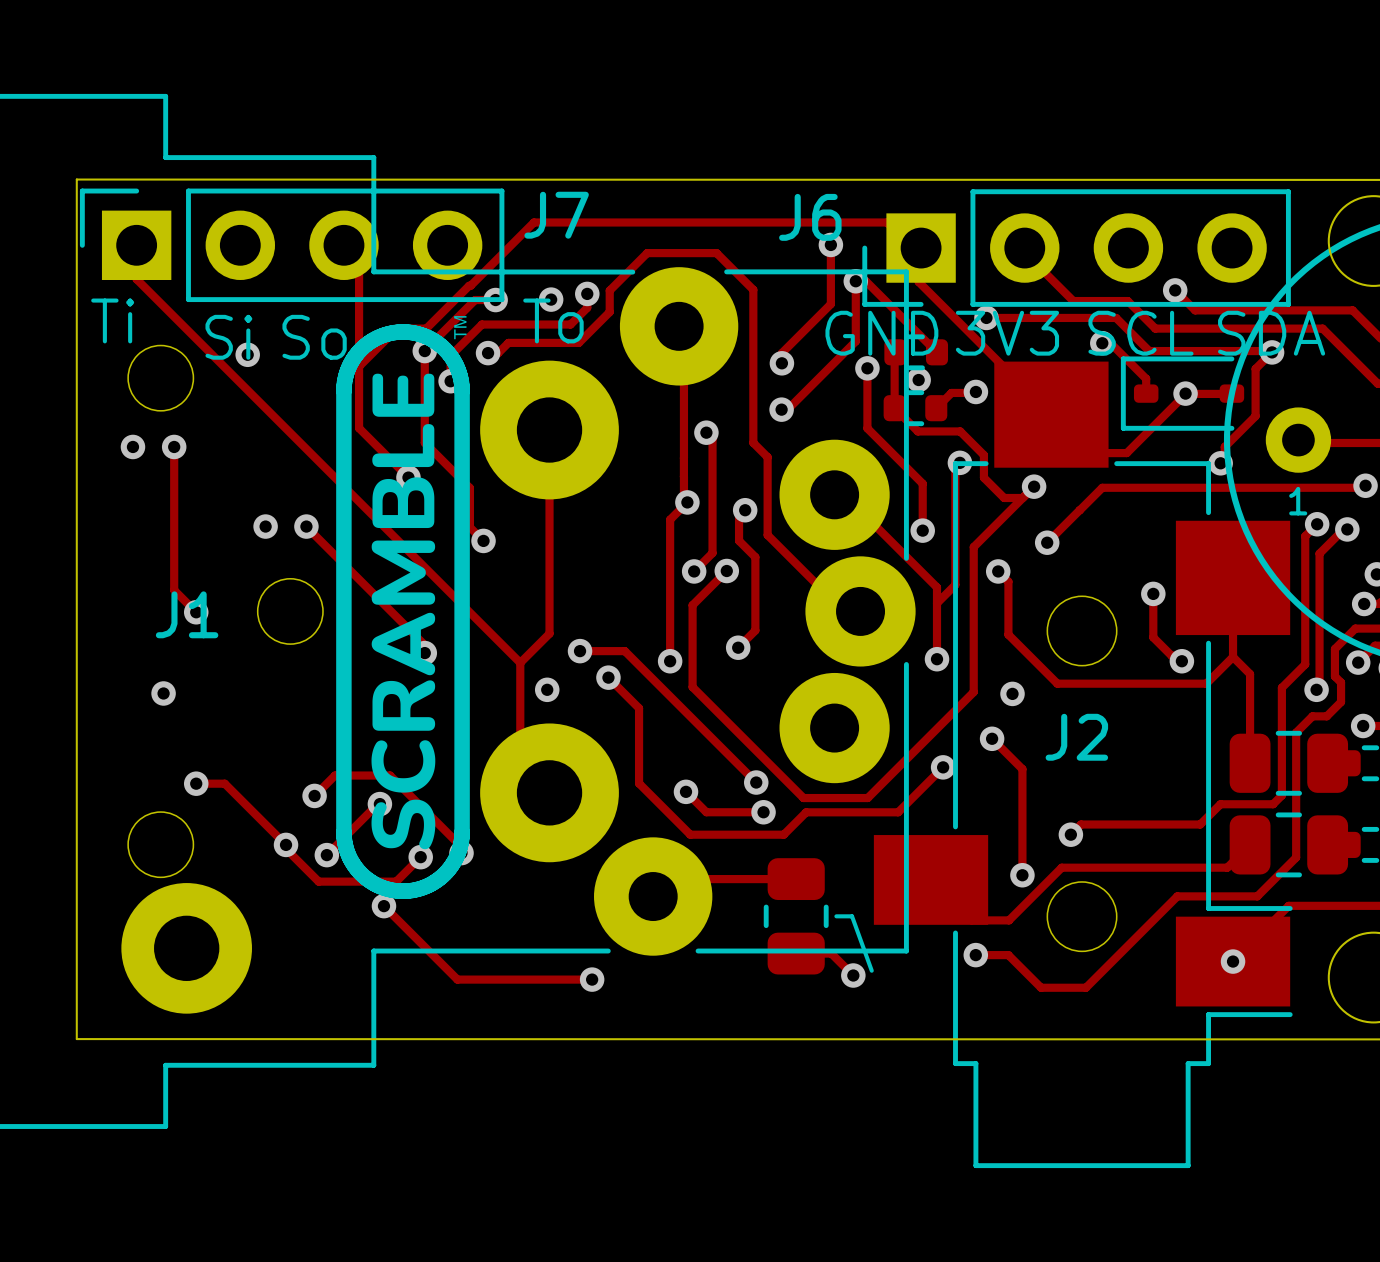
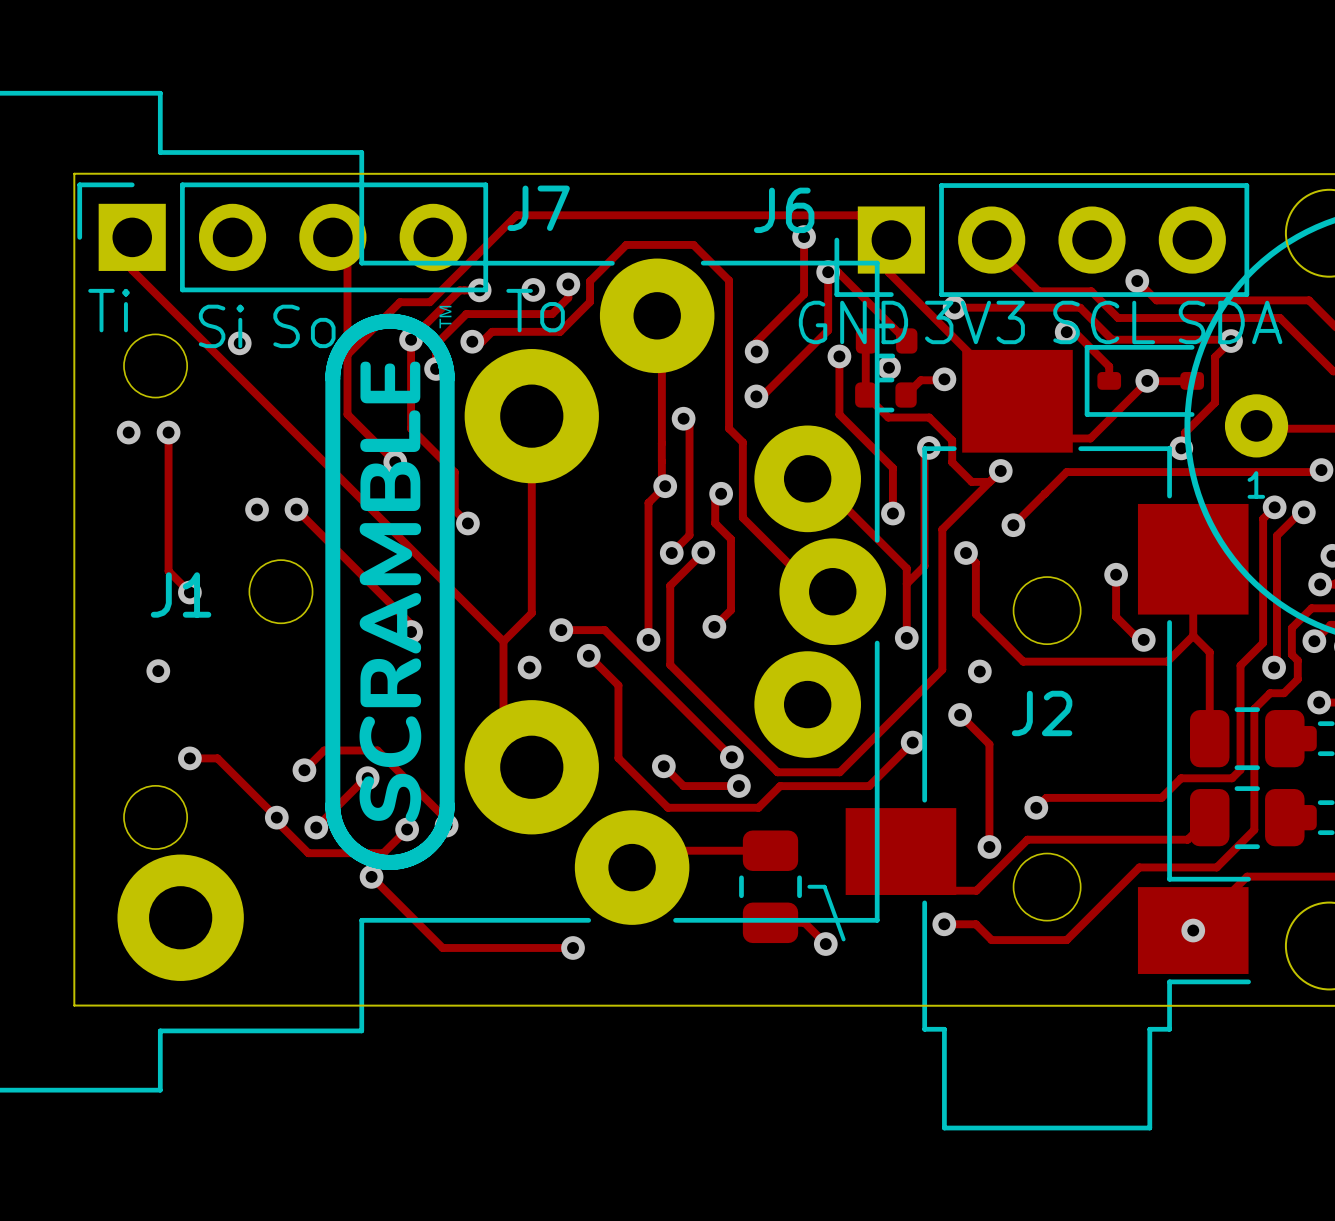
track: (470, 285) (426, 328) (397, 328) -> (455, 276) (429, 302) (400, 302) (384, 318)
track: (1024, 971) (1041, 987) (1085, 987) (1102, 971) -> (991, 940) (1066, 940)

